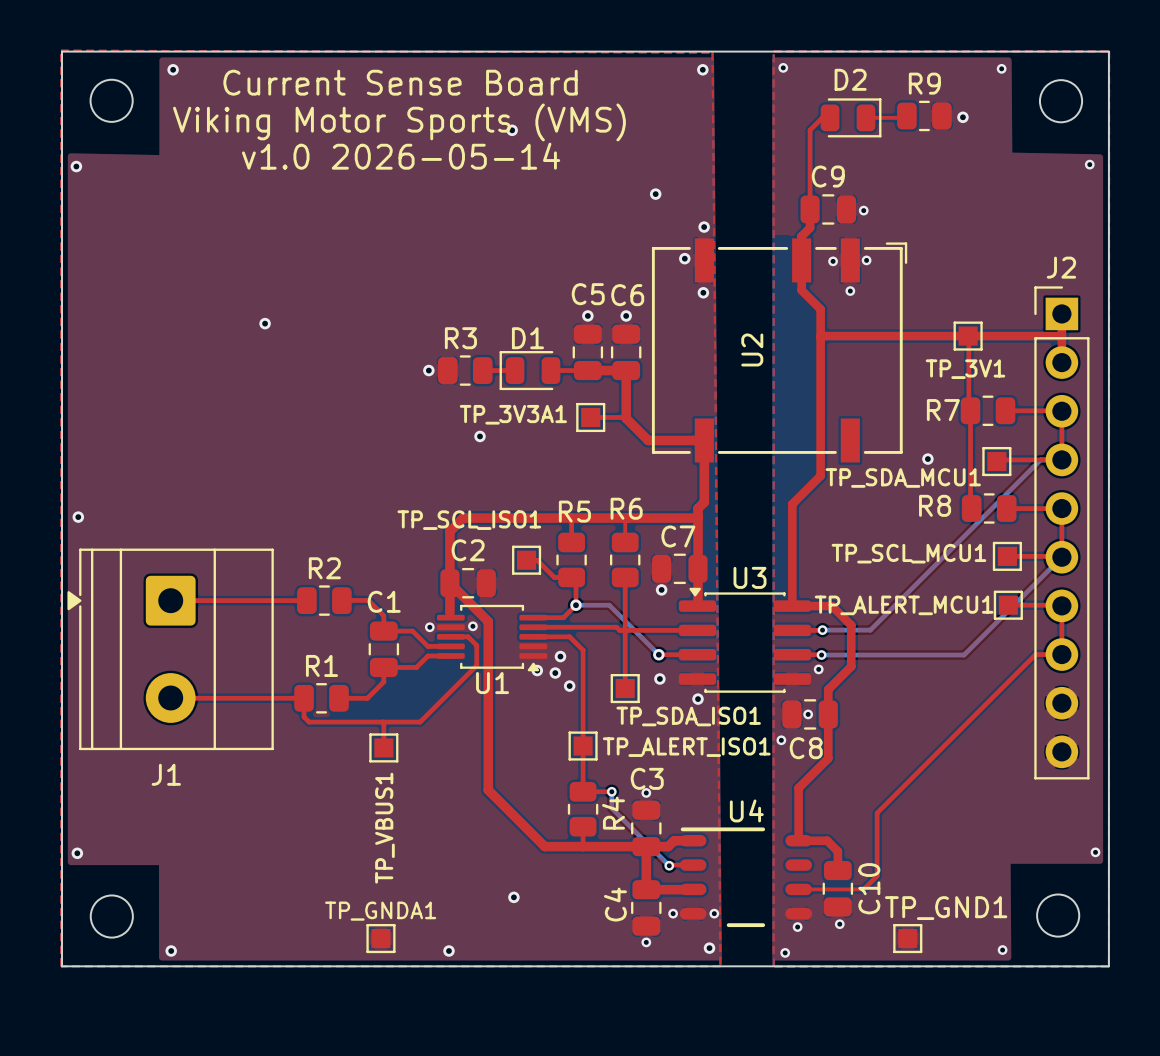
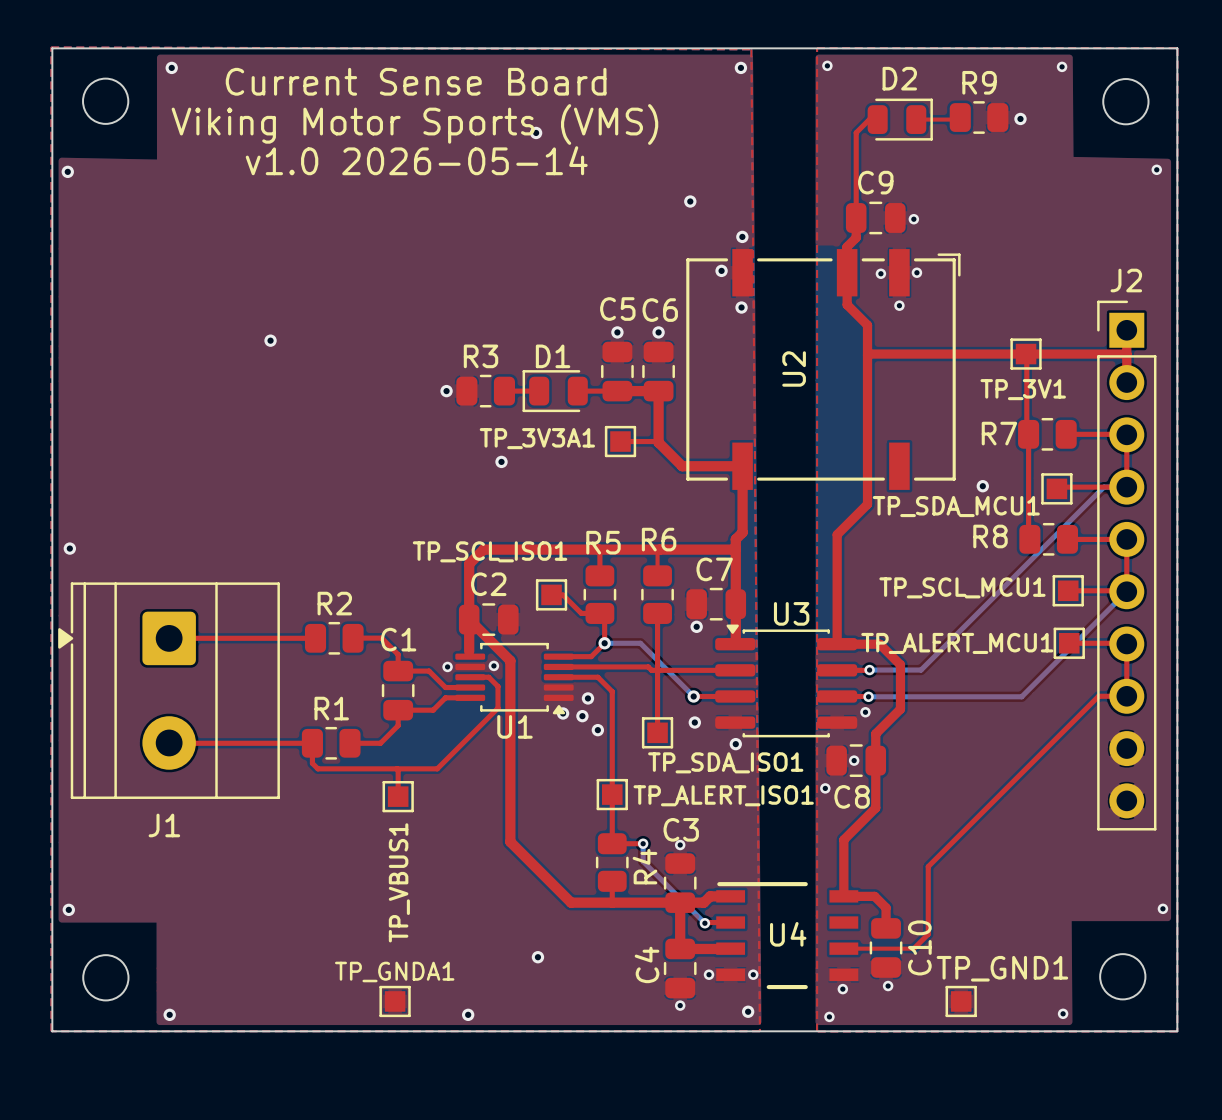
U4 name position: U4 (746, 810) -> U4 (788, 934)
U4 footprint: [679, 827, 813, 928] -> [716, 882, 859, 990]

